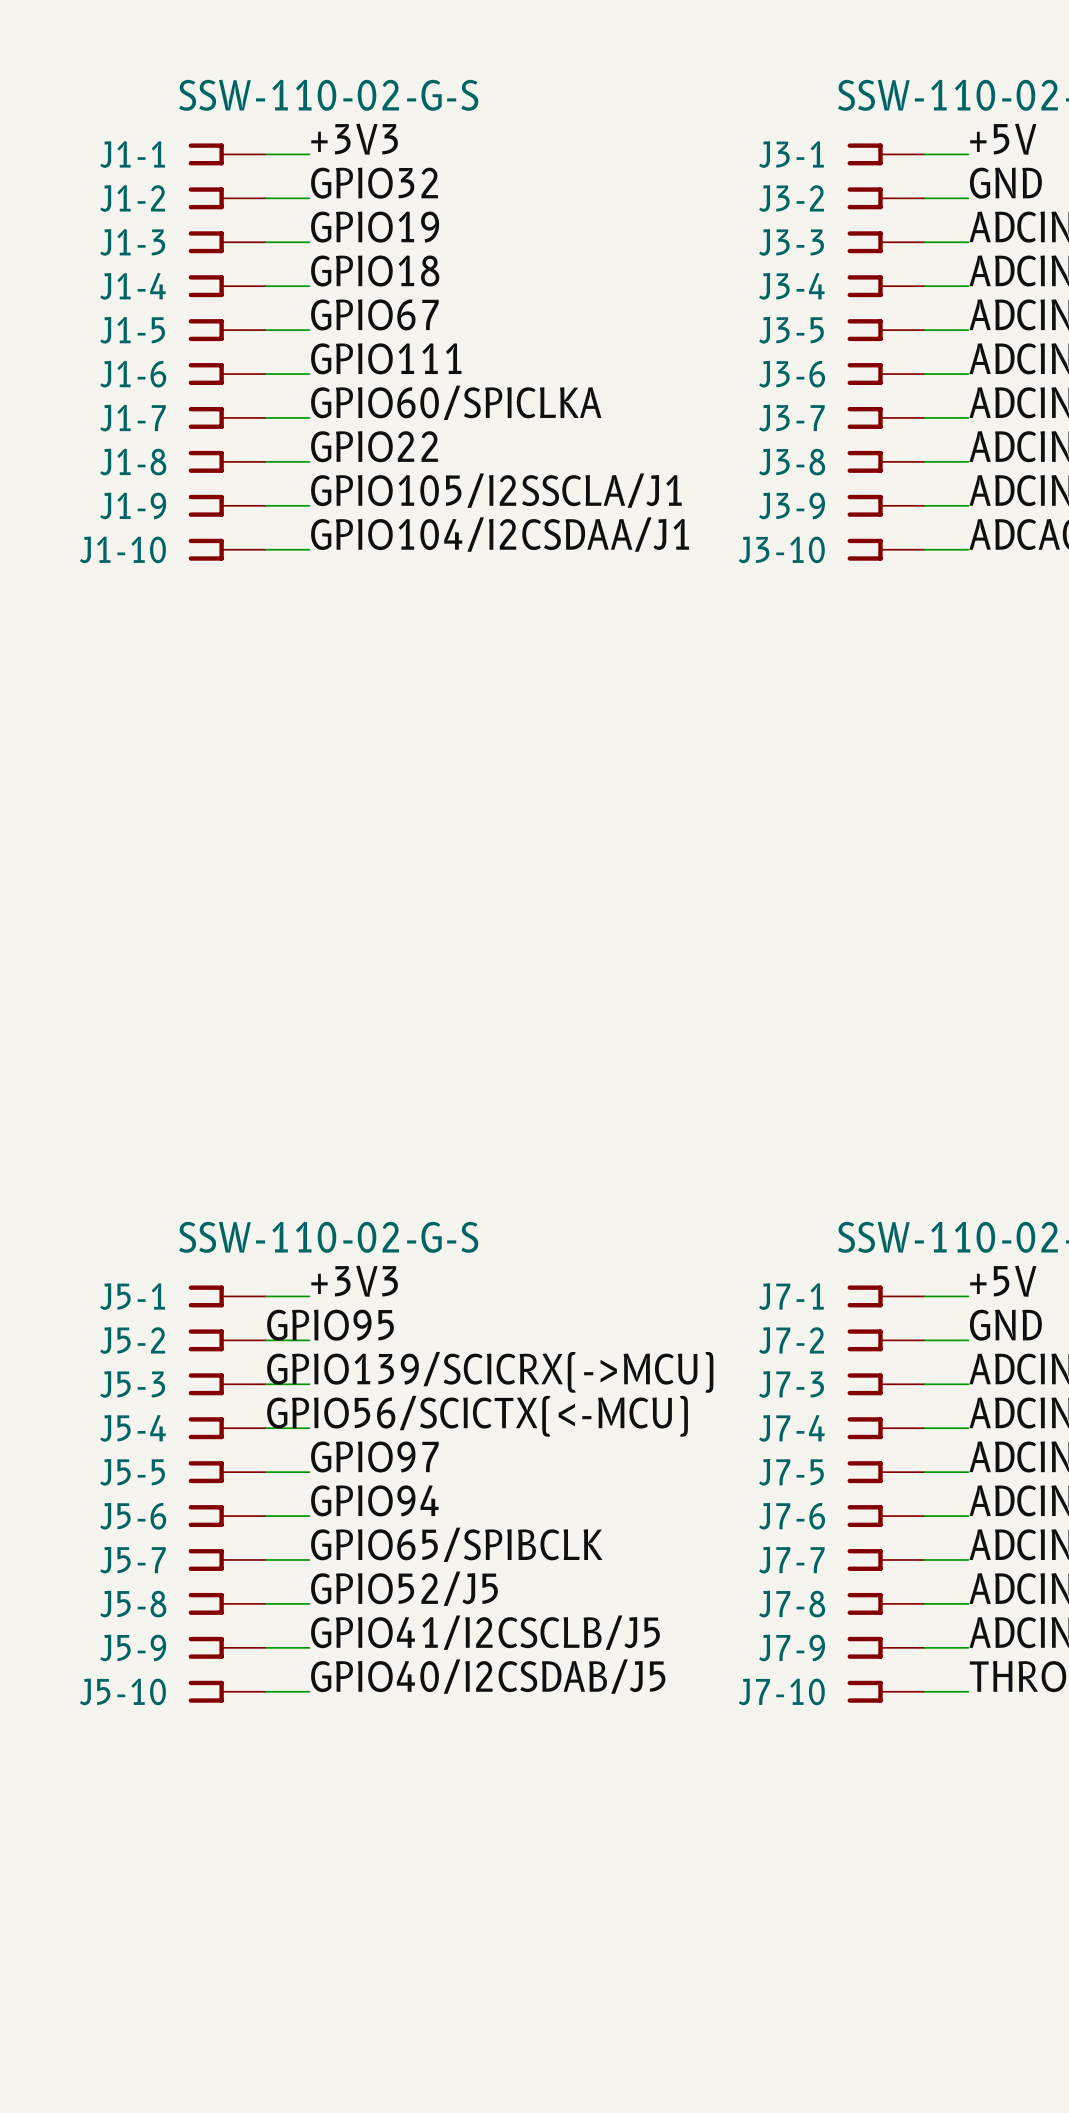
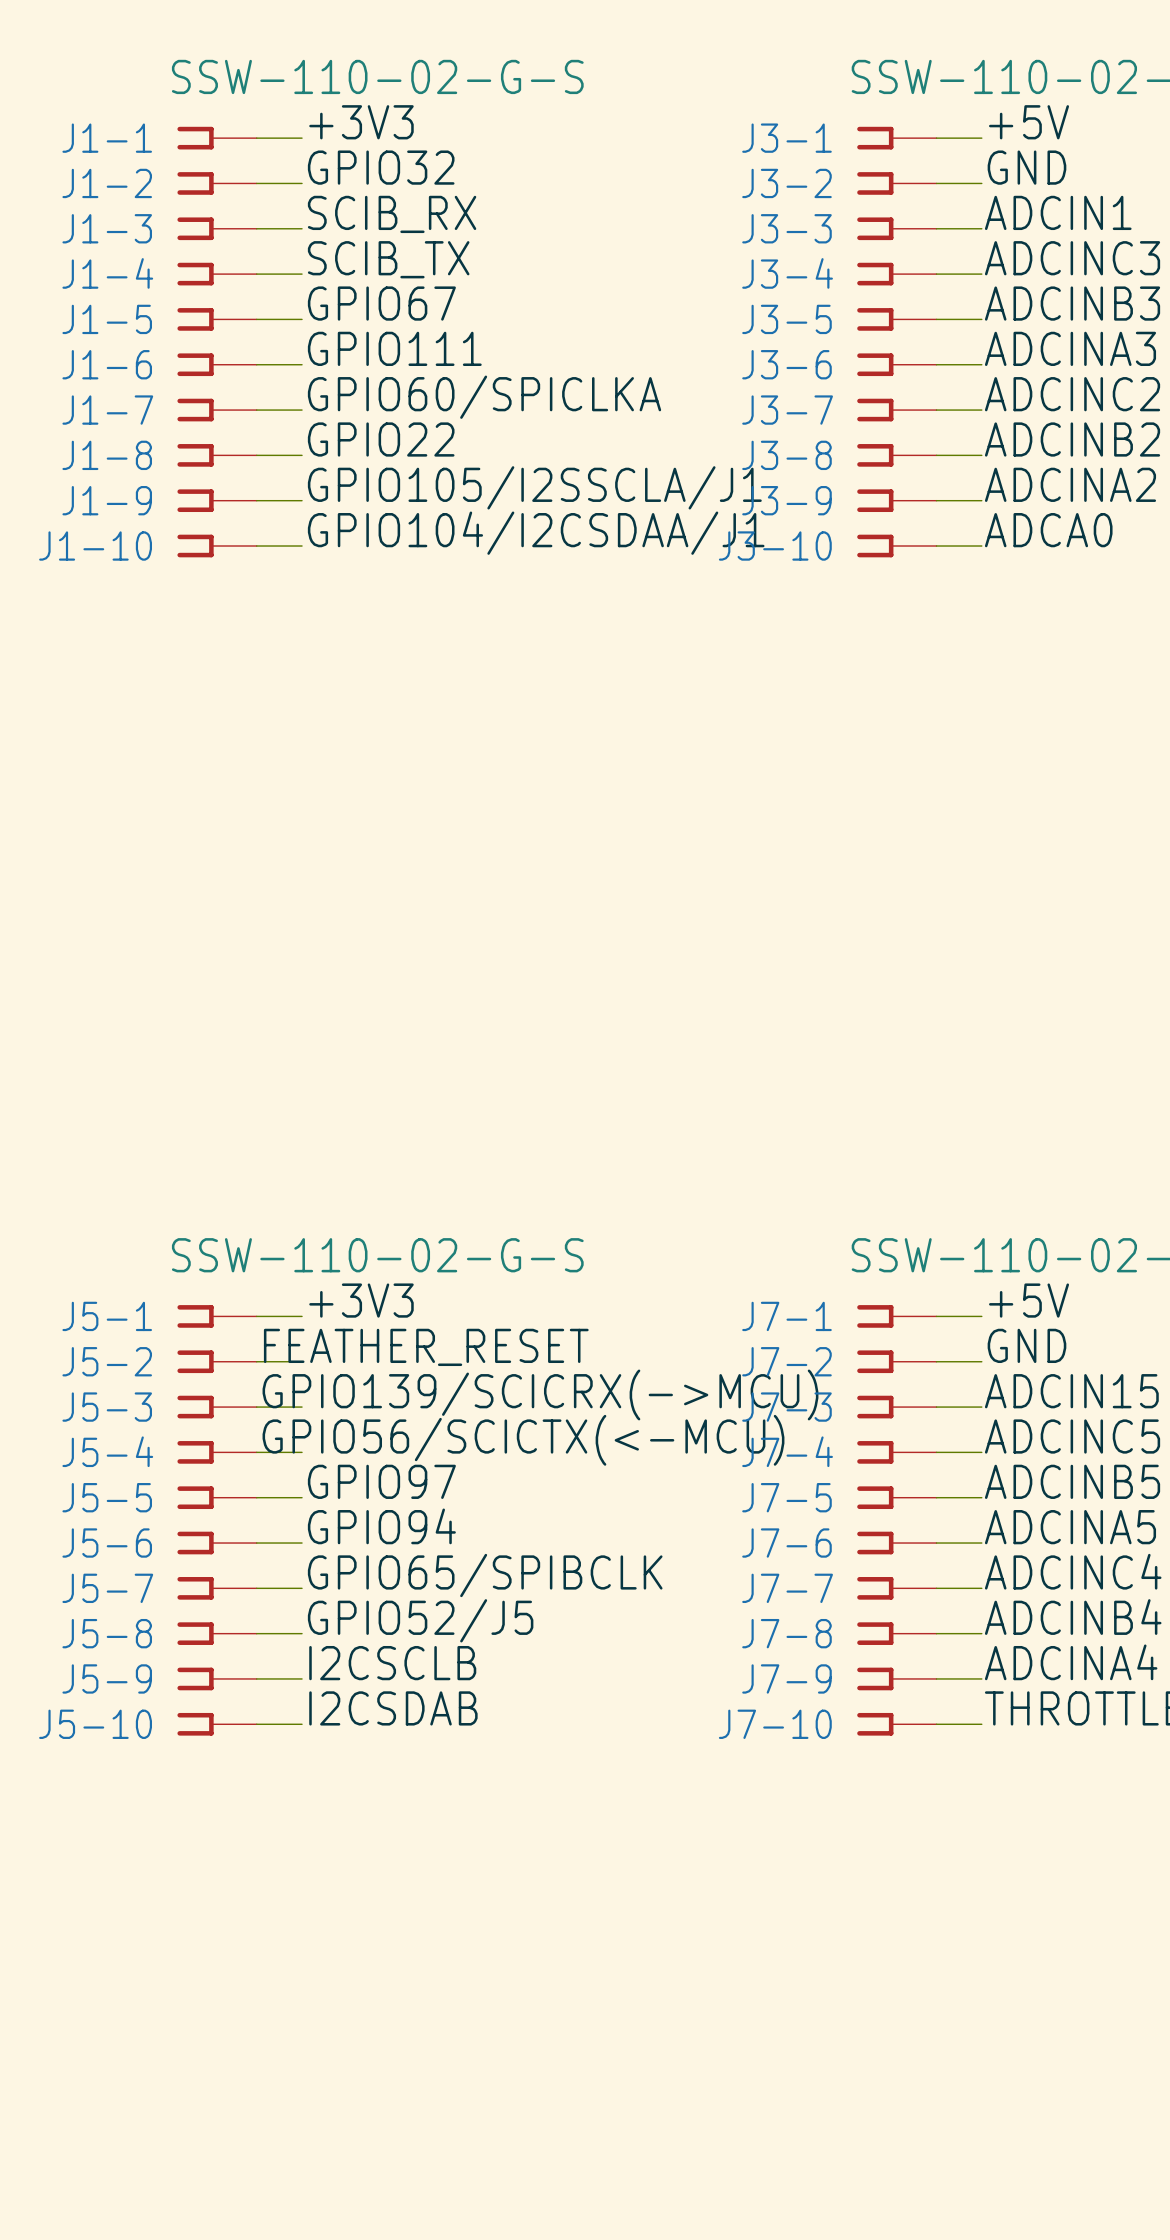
label: GPIO19 (375, 227) -> SCIB_RX (392, 214)
label: GPIO18 (375, 270) -> SCIB_TX (388, 259)
label: GPIO95 (330, 1325) -> FEATHER_RESET (426, 1347)
label: GPIO41/I2CSCLB/J5 (485, 1632) -> I2CSCLB (392, 1663)
label: GPIO40/I2CSDAB/J5 (488, 1676) -> I2CSDAB (393, 1708)

